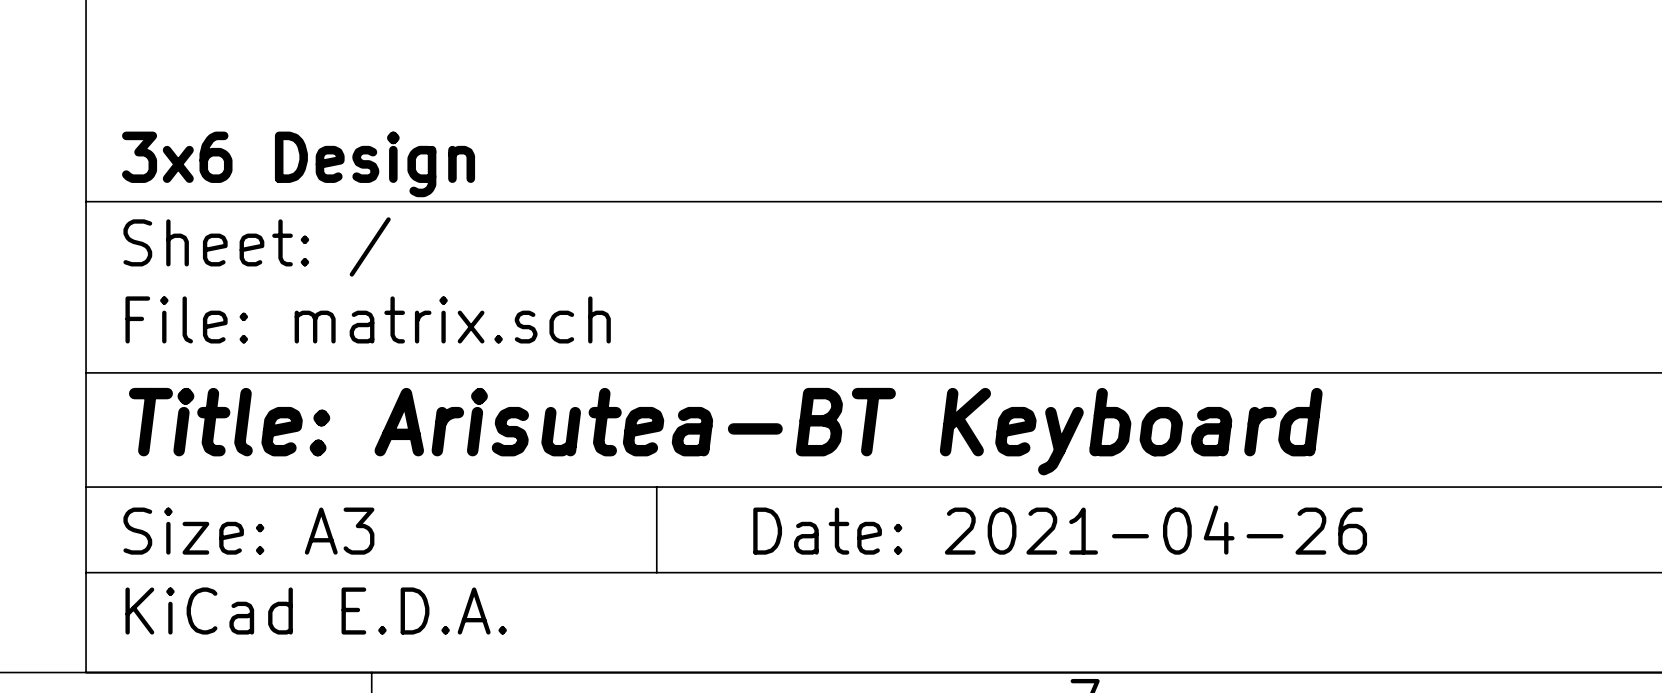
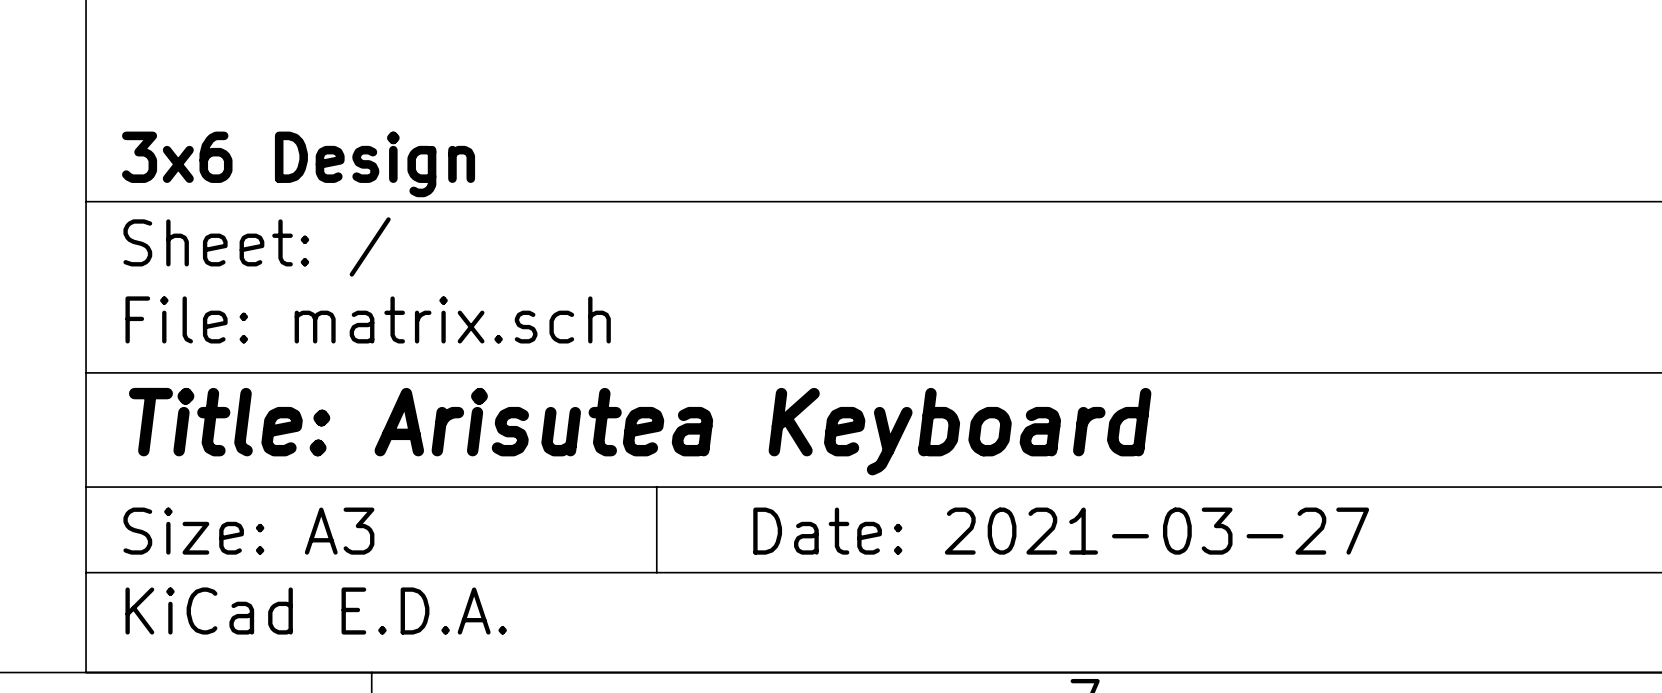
title block: Title: Arisutea-BT Keyboard (725, 431) -> Title: Arisutea Keyboard (640, 431)
title block: Date: 2021-04-26 (1060, 530) -> Date: 2021-03-27 (1061, 531)

